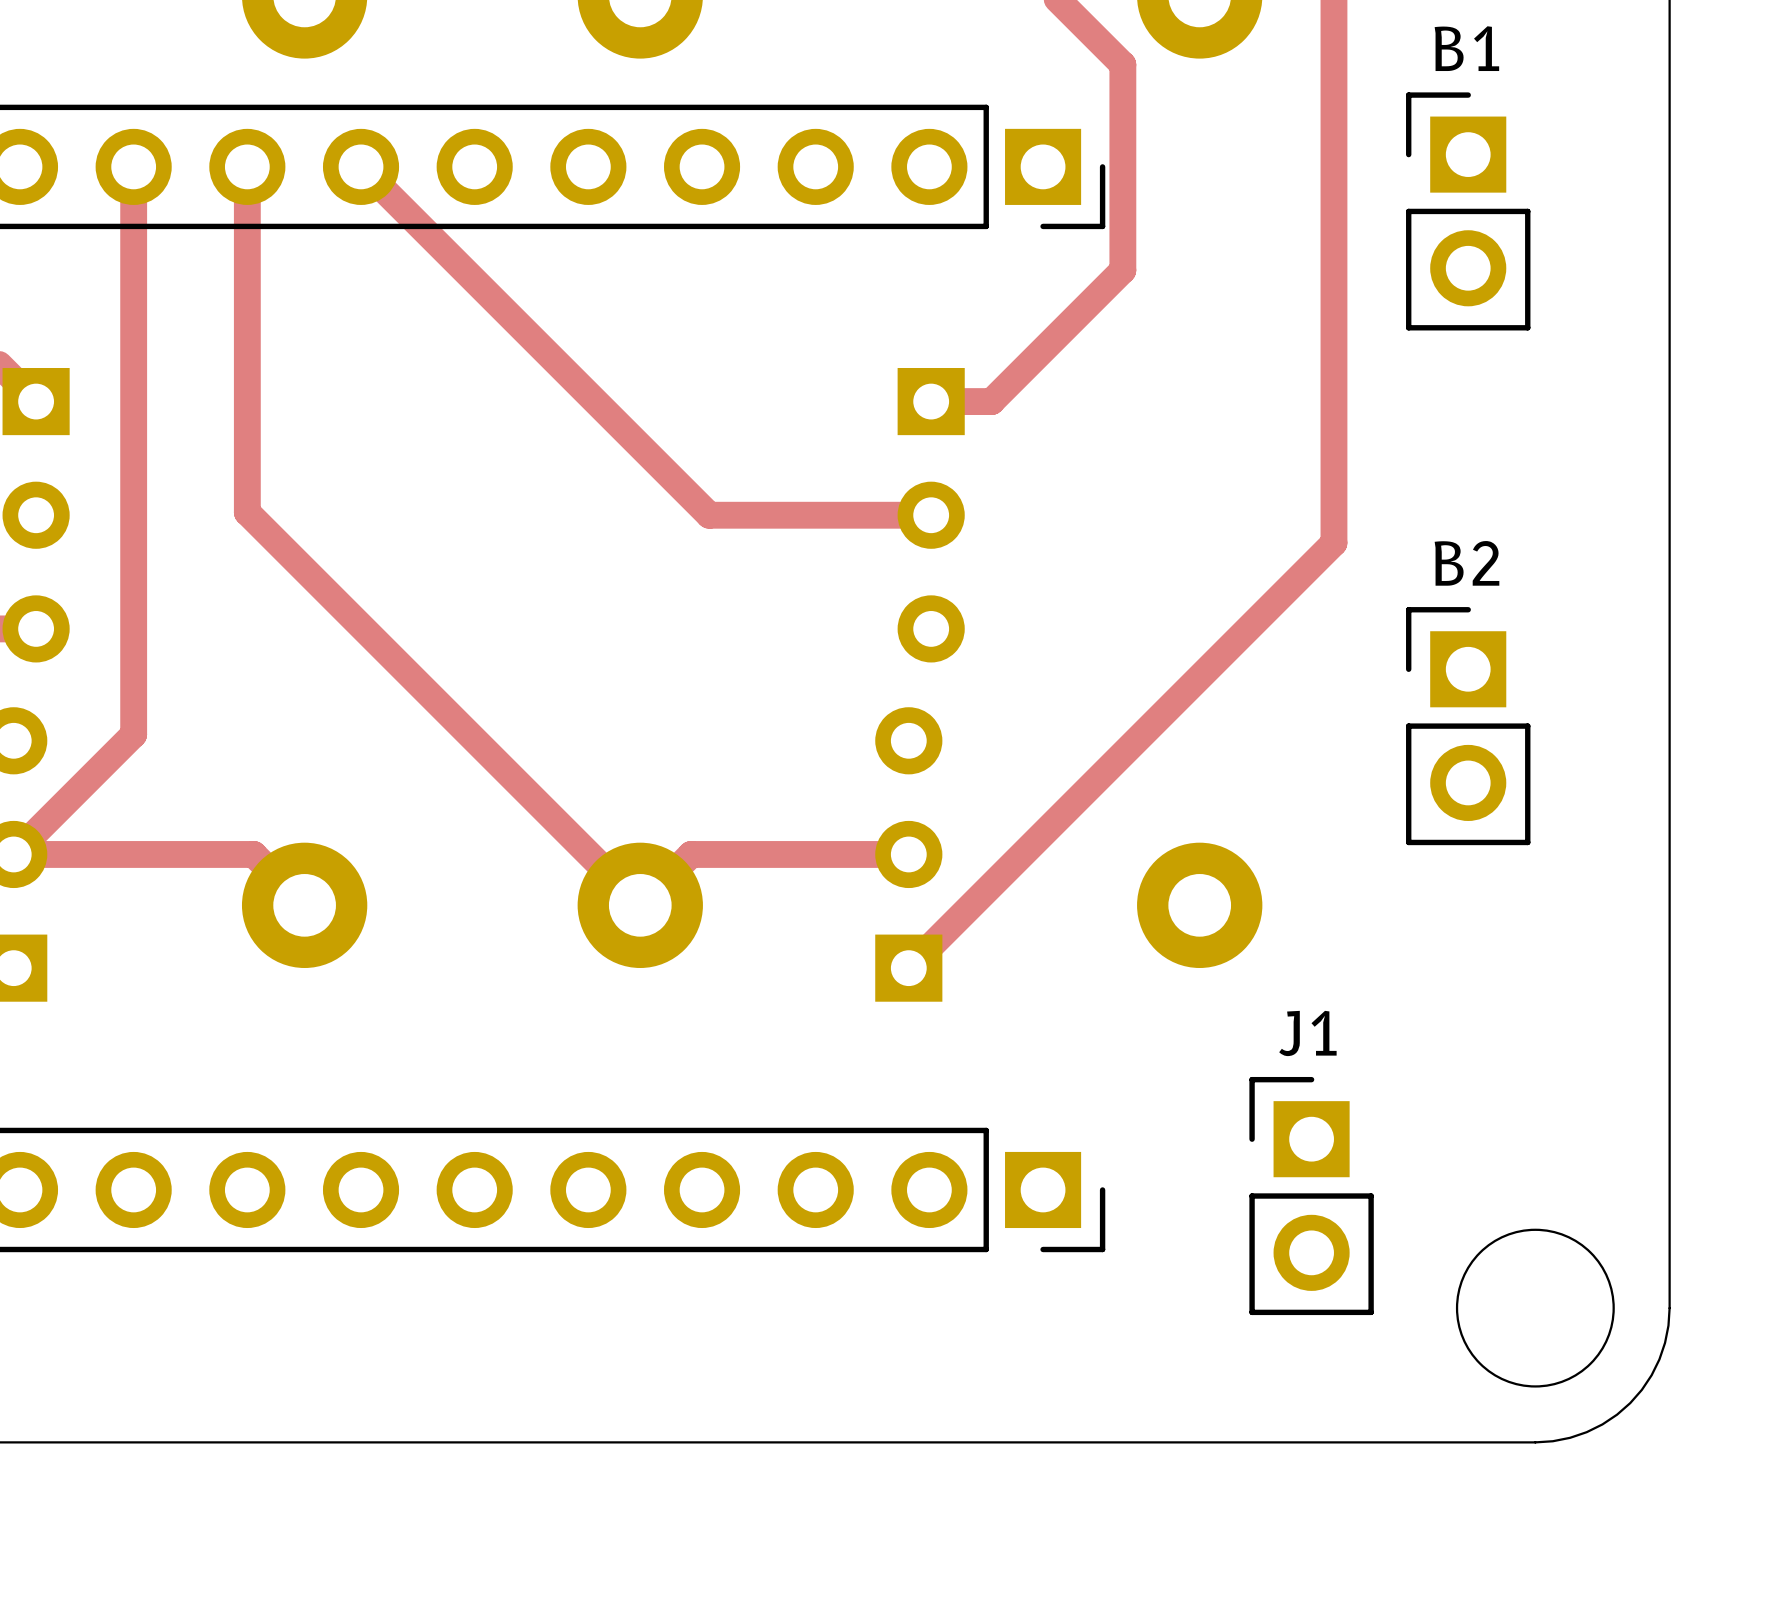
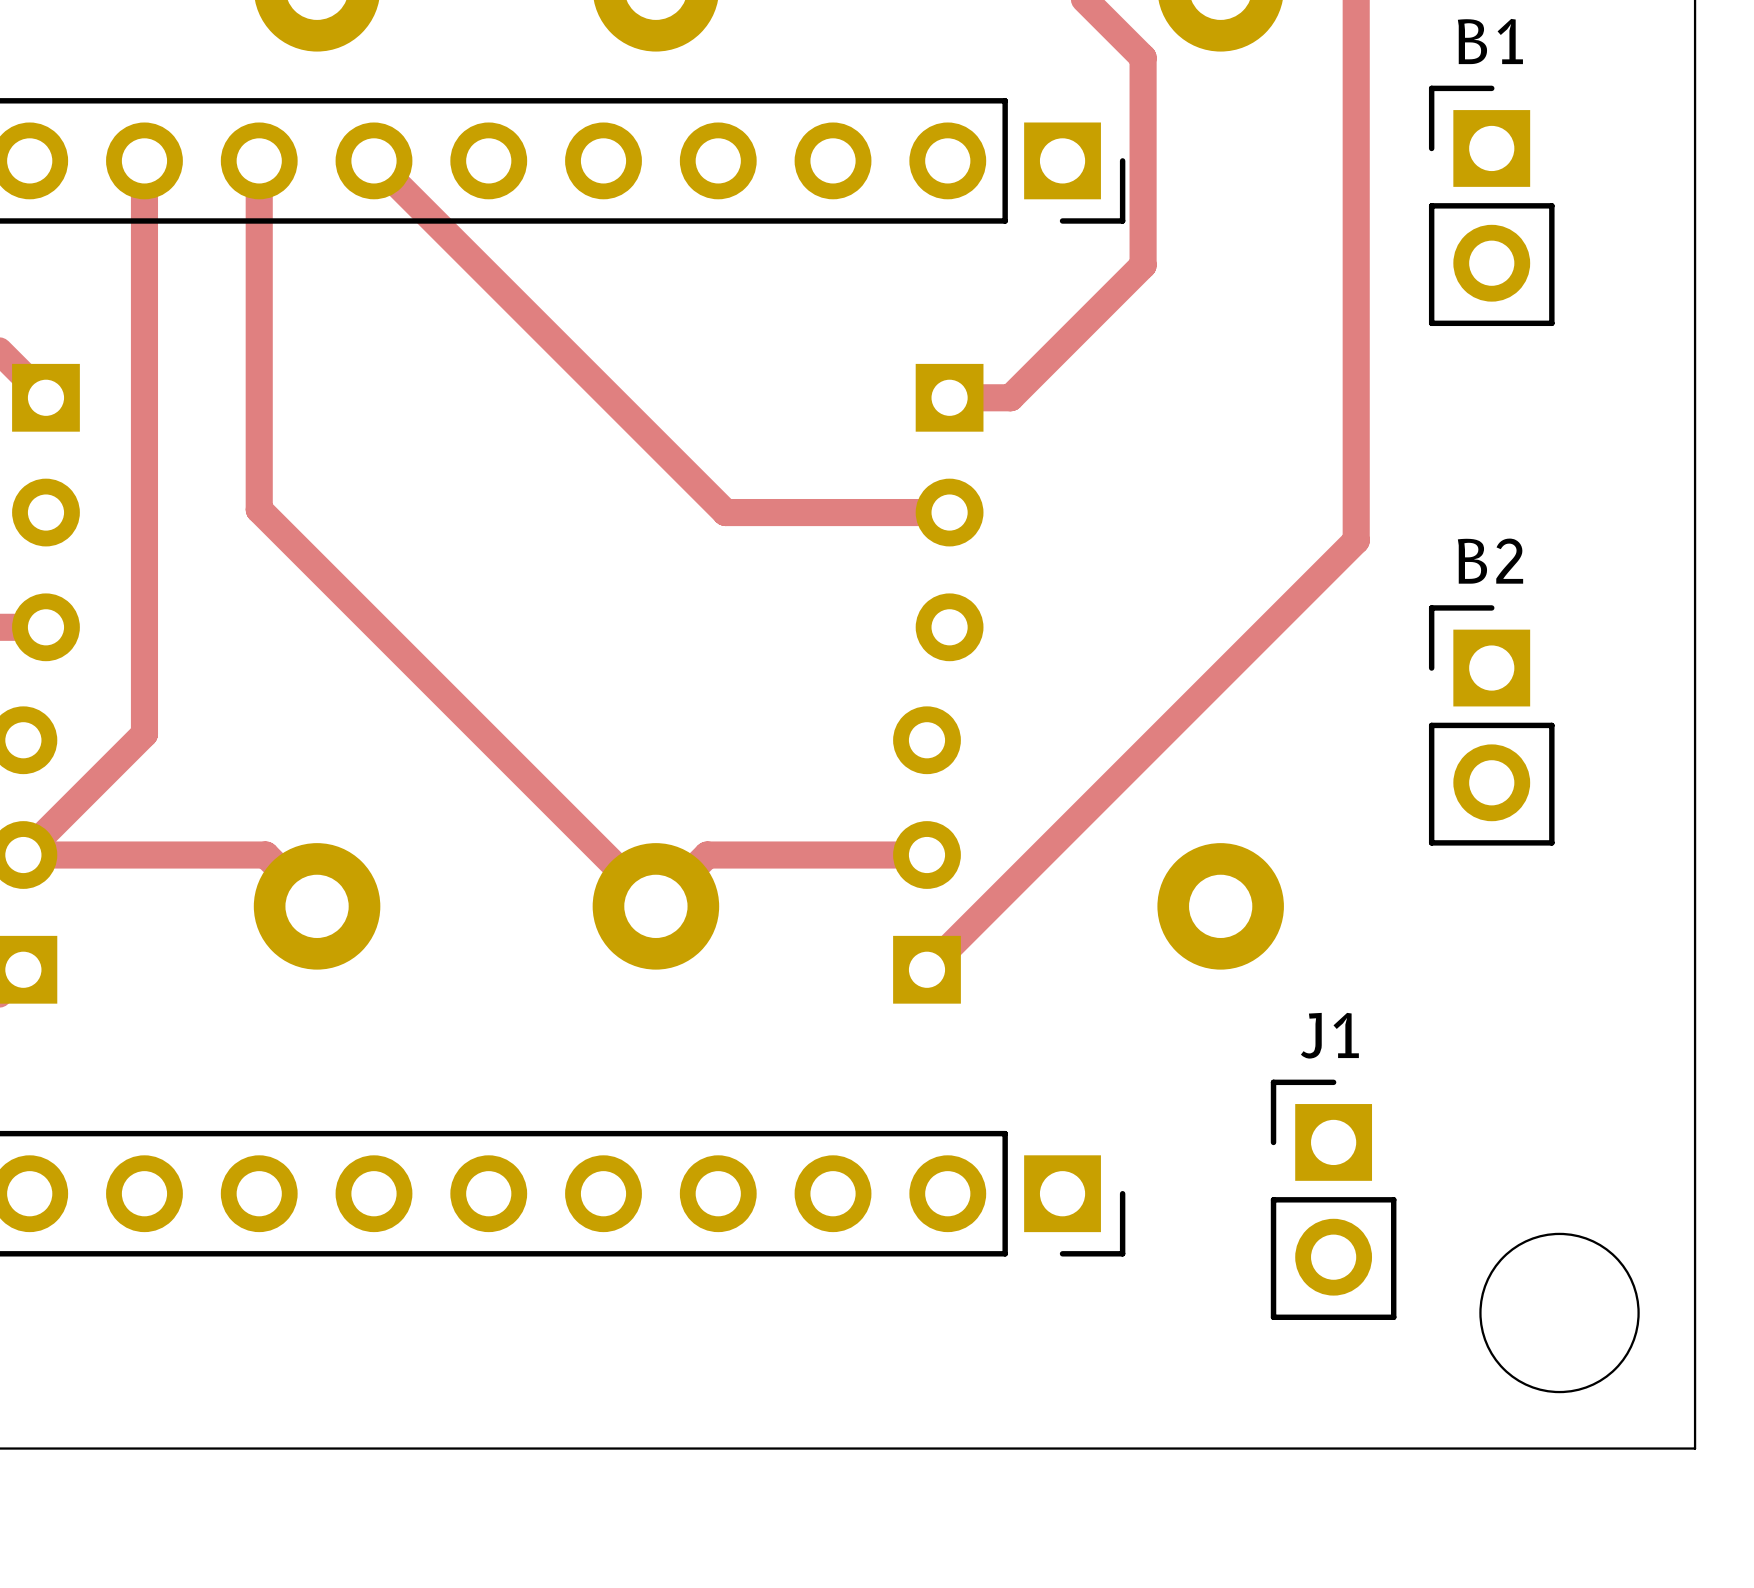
board edge: (1669, 1308) (1665, 1342) (1659, 1359) (1651, 1375) (1630, 1403) (1602, 1424) (1586, 1432) (1552, 1441) (1535, 1442) -> (1695, 1312) (1695, 1448) (1559, 1448)

